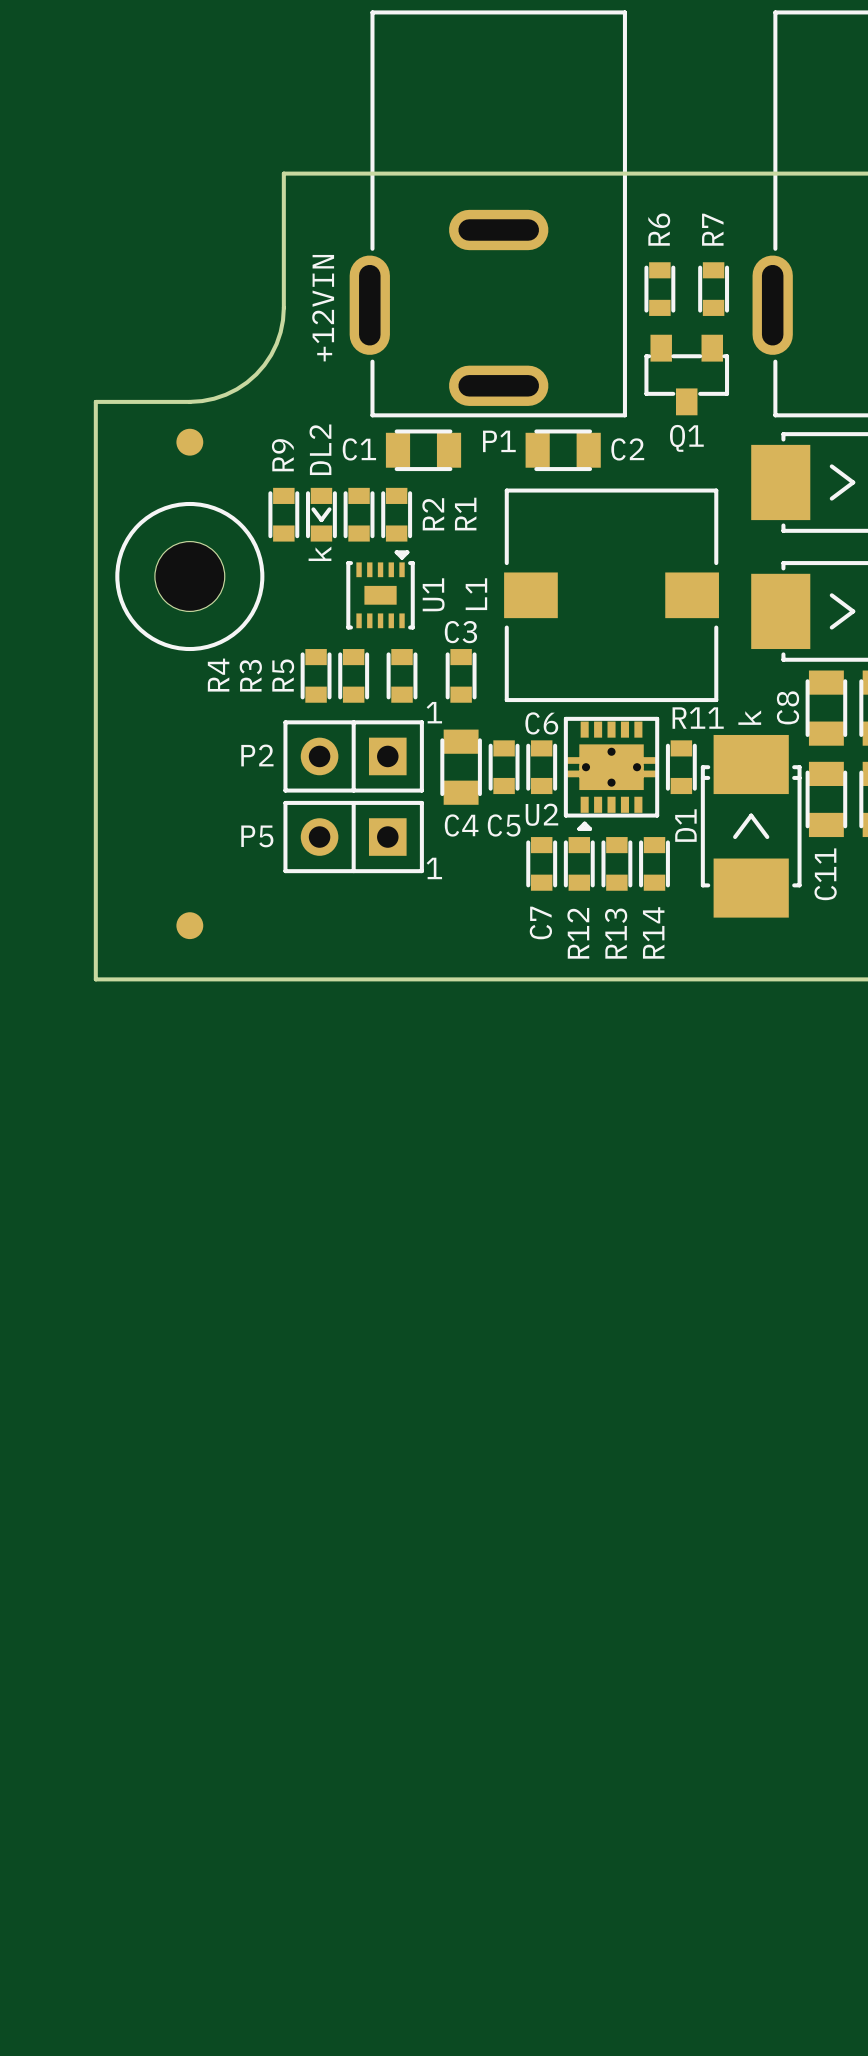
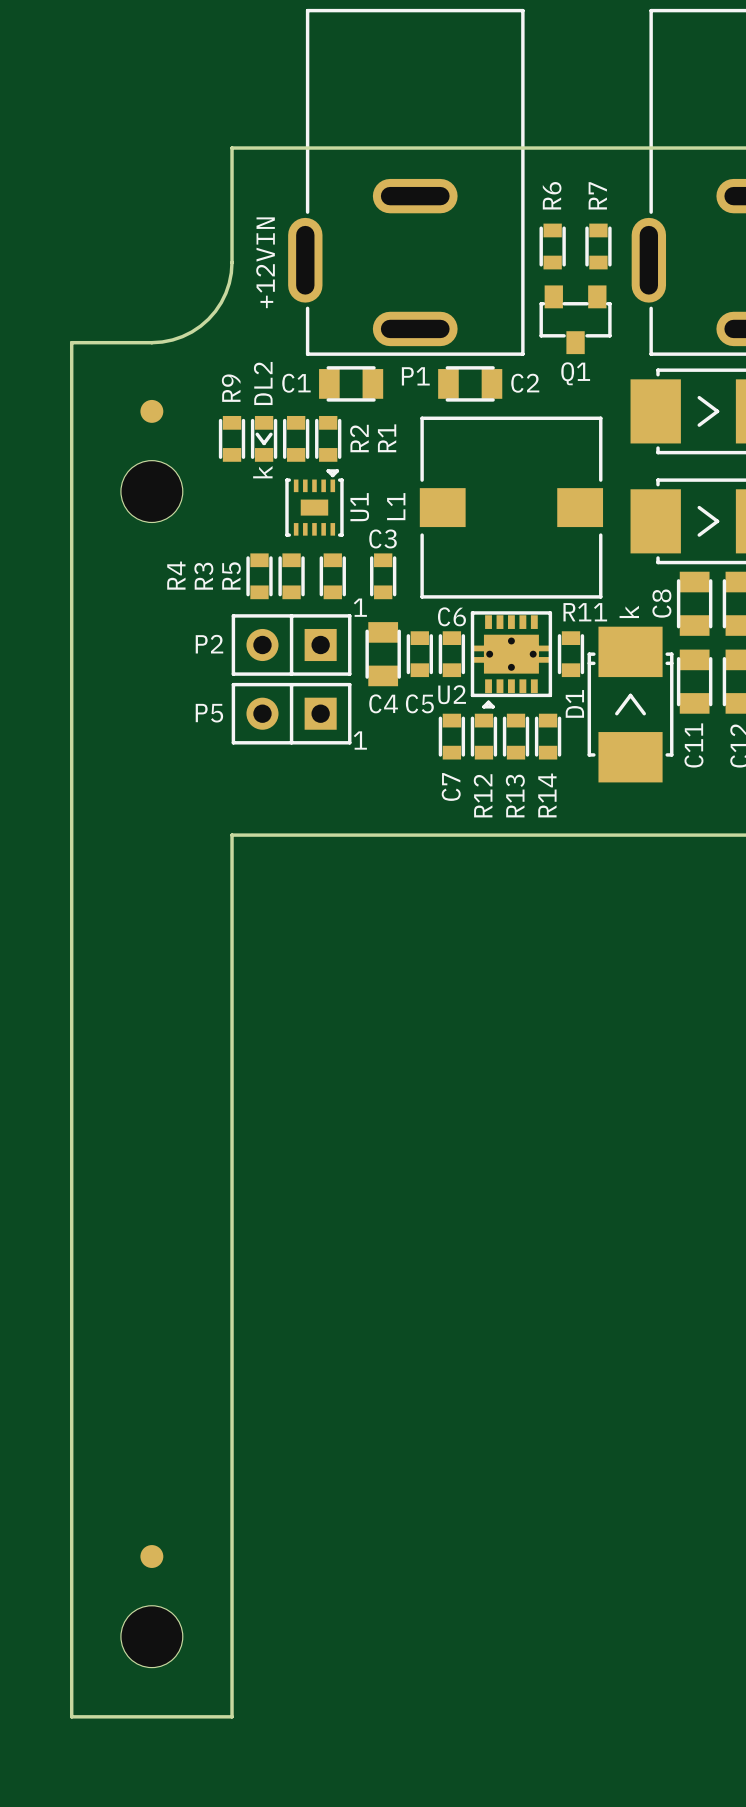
part position: (189, 442) -> (151, 411)
part footprint: [115, 501, 265, 652] -> [120, 460, 183, 523]
part: (189, 925) -> none
board edge: (95, 979) (283, 979) -> (71, 835) (71, 1716) (232, 1716) (232, 835)
part: none -> (151, 1556)
part: none -> (151, 1636)

